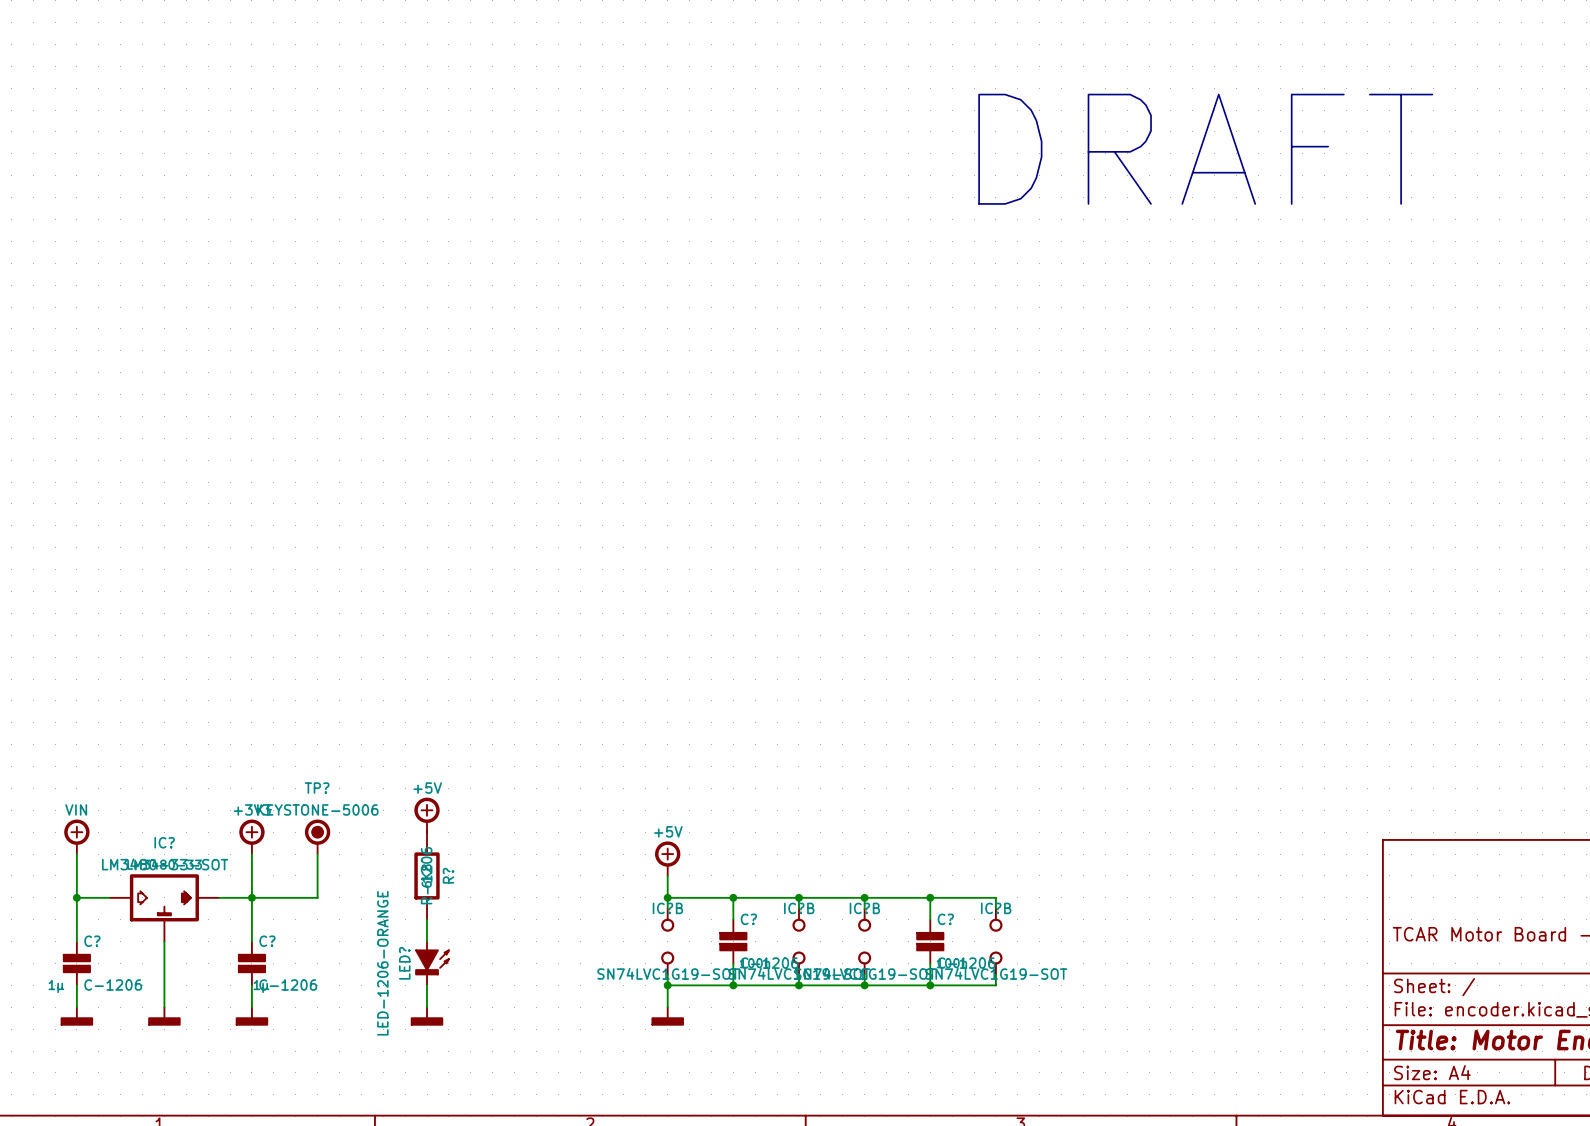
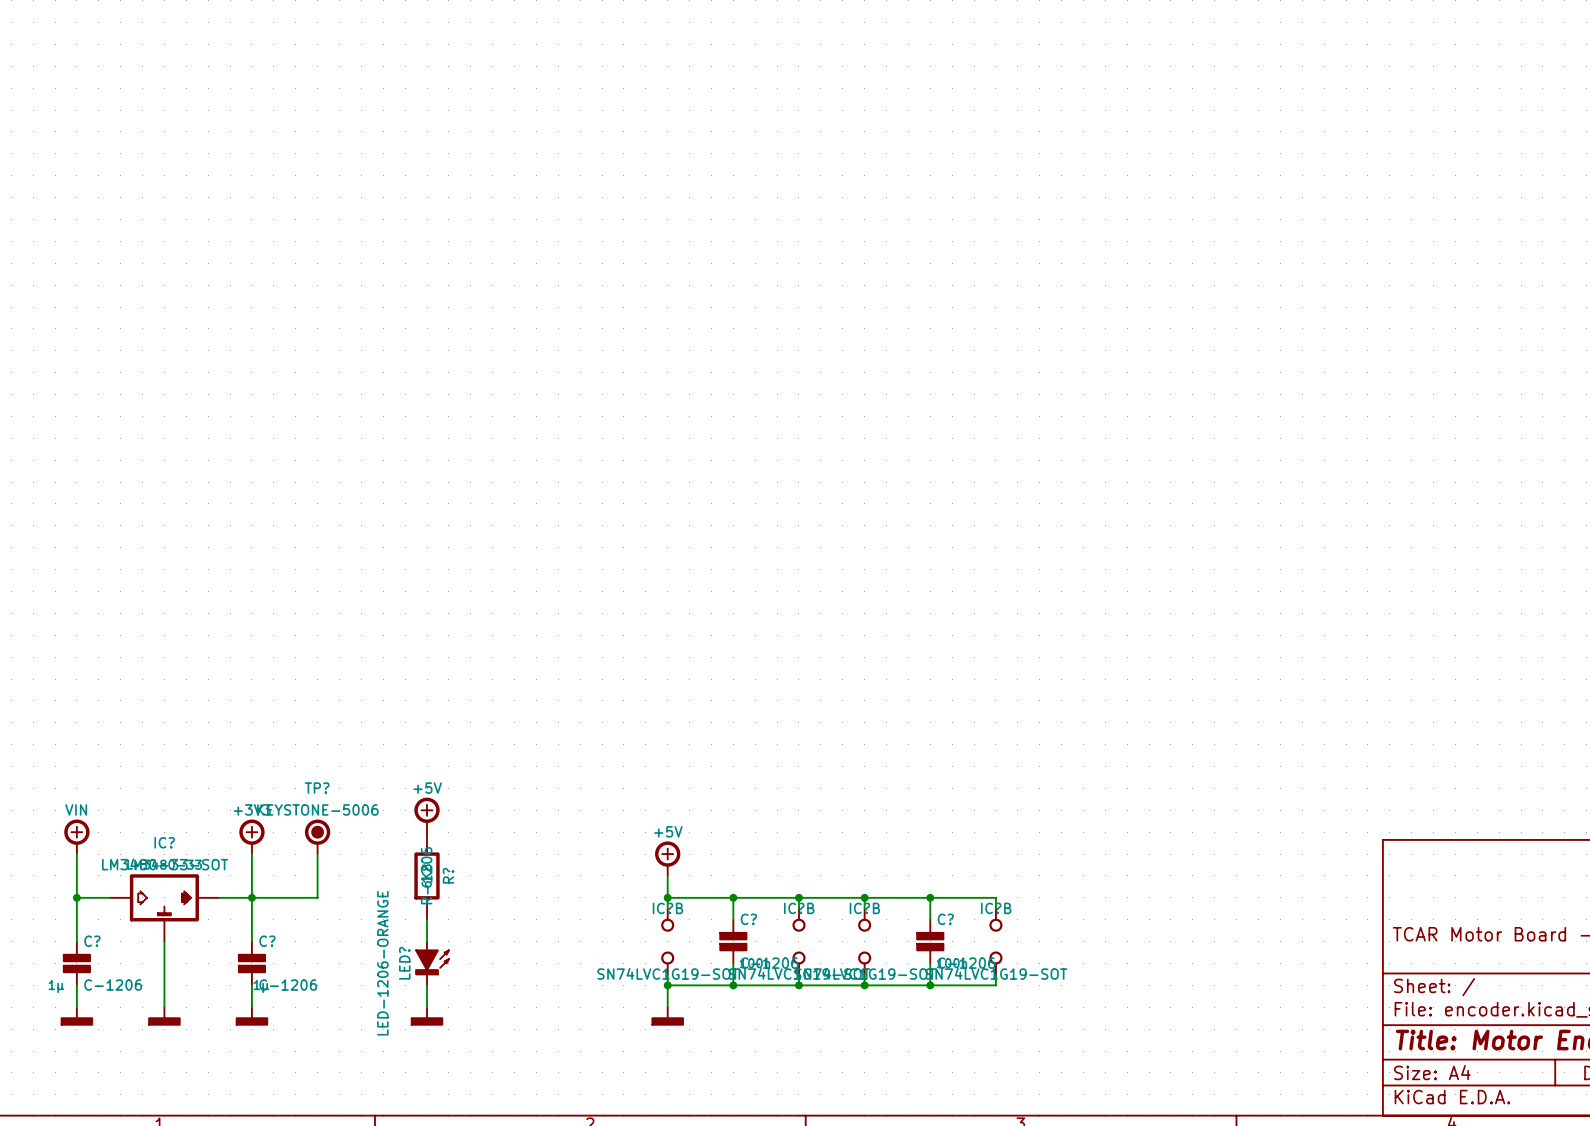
text: DRAFT (1205, 149) -> none

